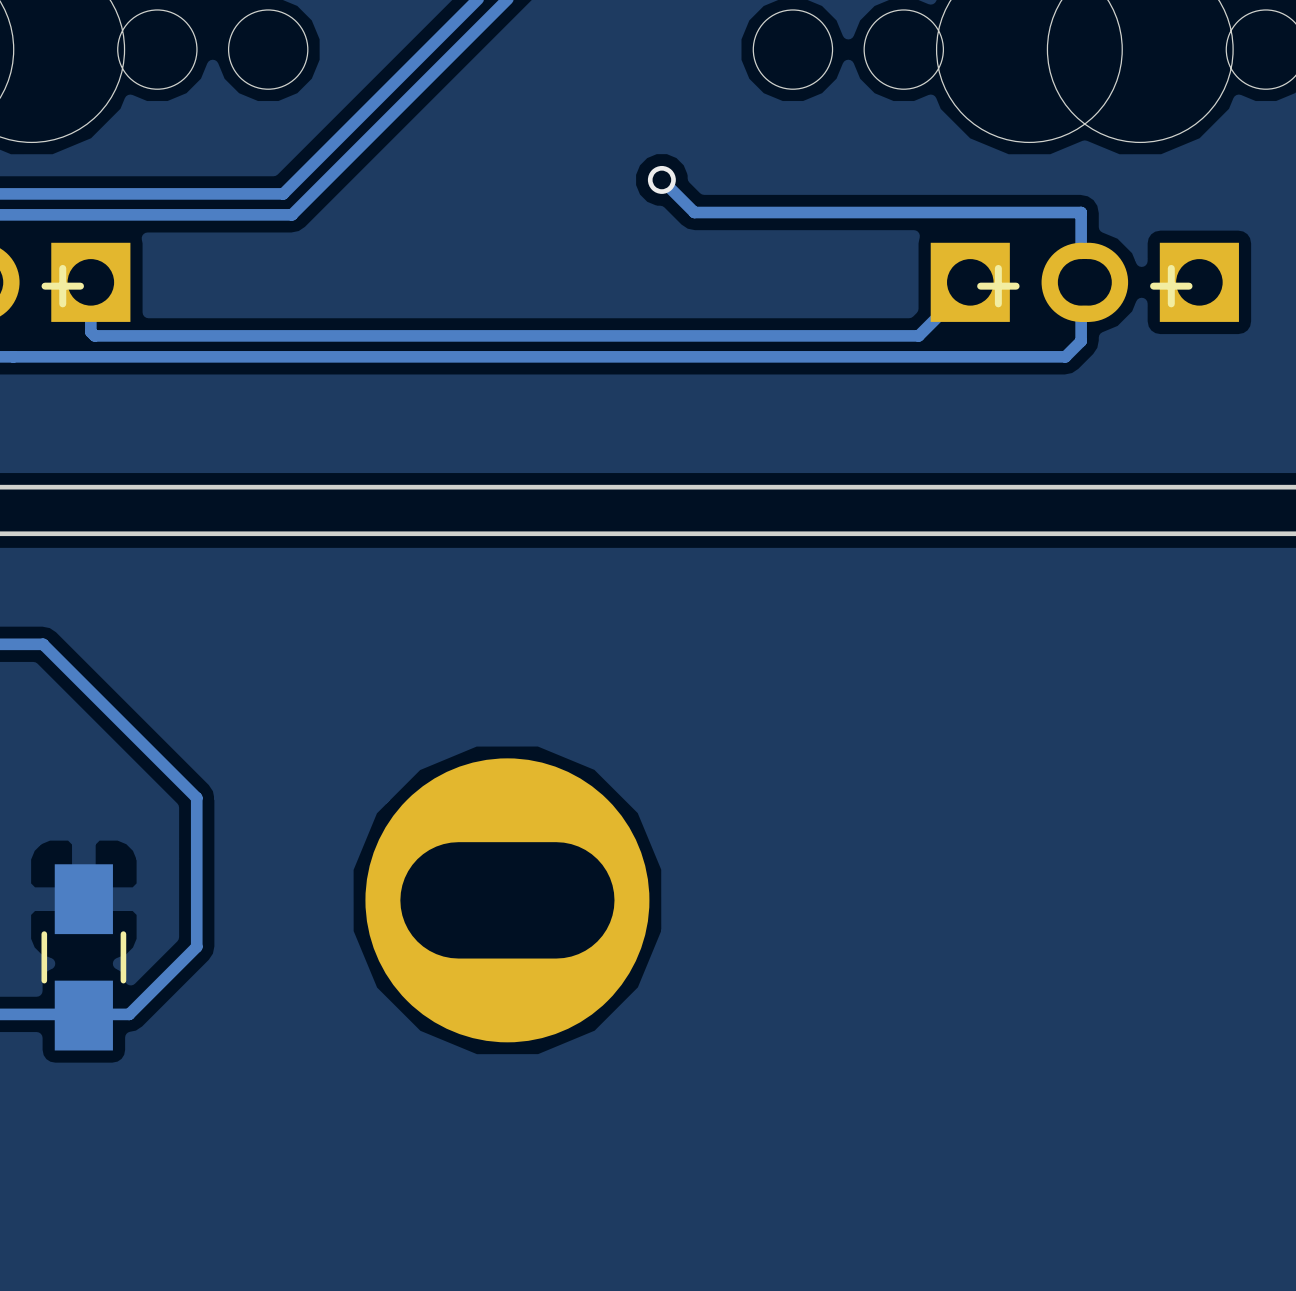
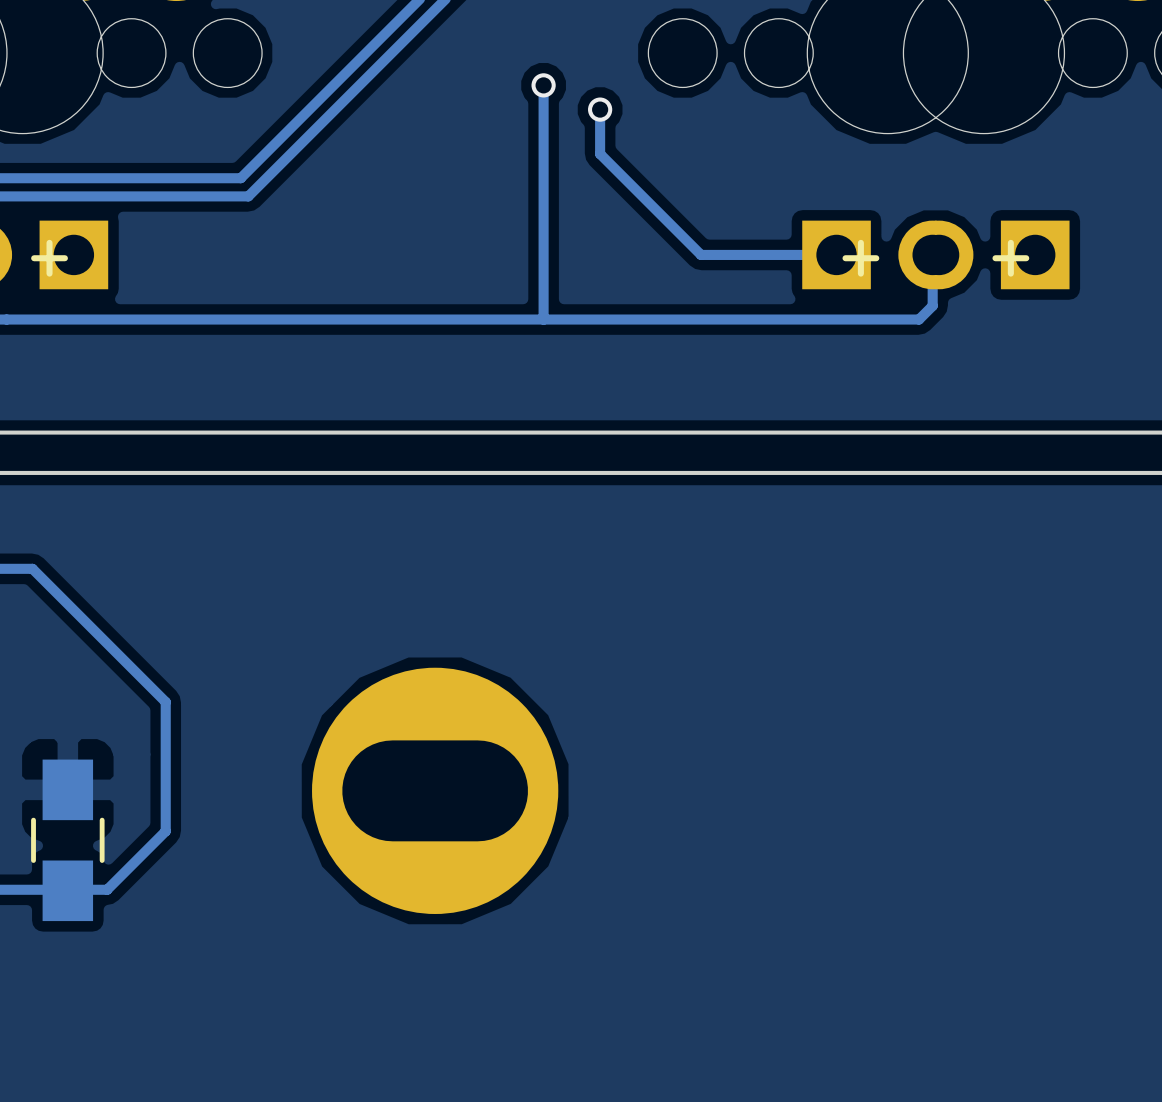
track: none -> (543, 85) (543, 319)
via: none -> (543, 85)
track: none -> (600, 109) (600, 154) (701, 254) (836, 254)
via: none -> (600, 109)
track: (661, 179) (694, 212) (1081, 212) (1081, 282) -> none
via: (661, 179) -> none
track: (90, 282) (90, 331) (94, 335) (918, 335) (970, 284) -> none

